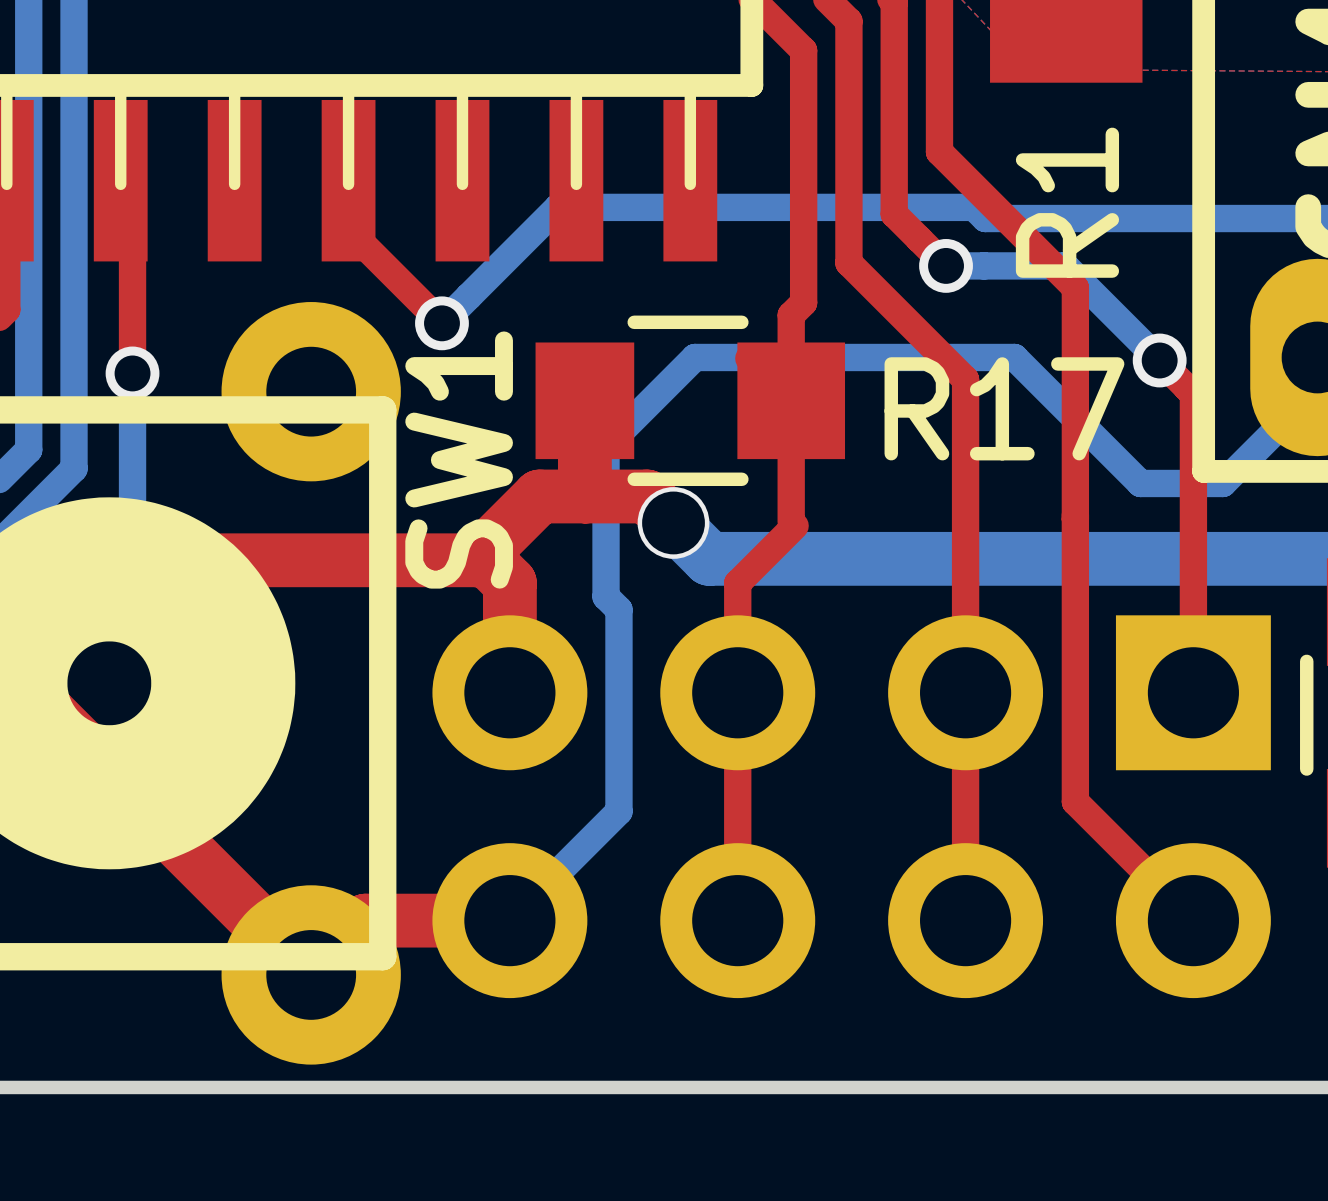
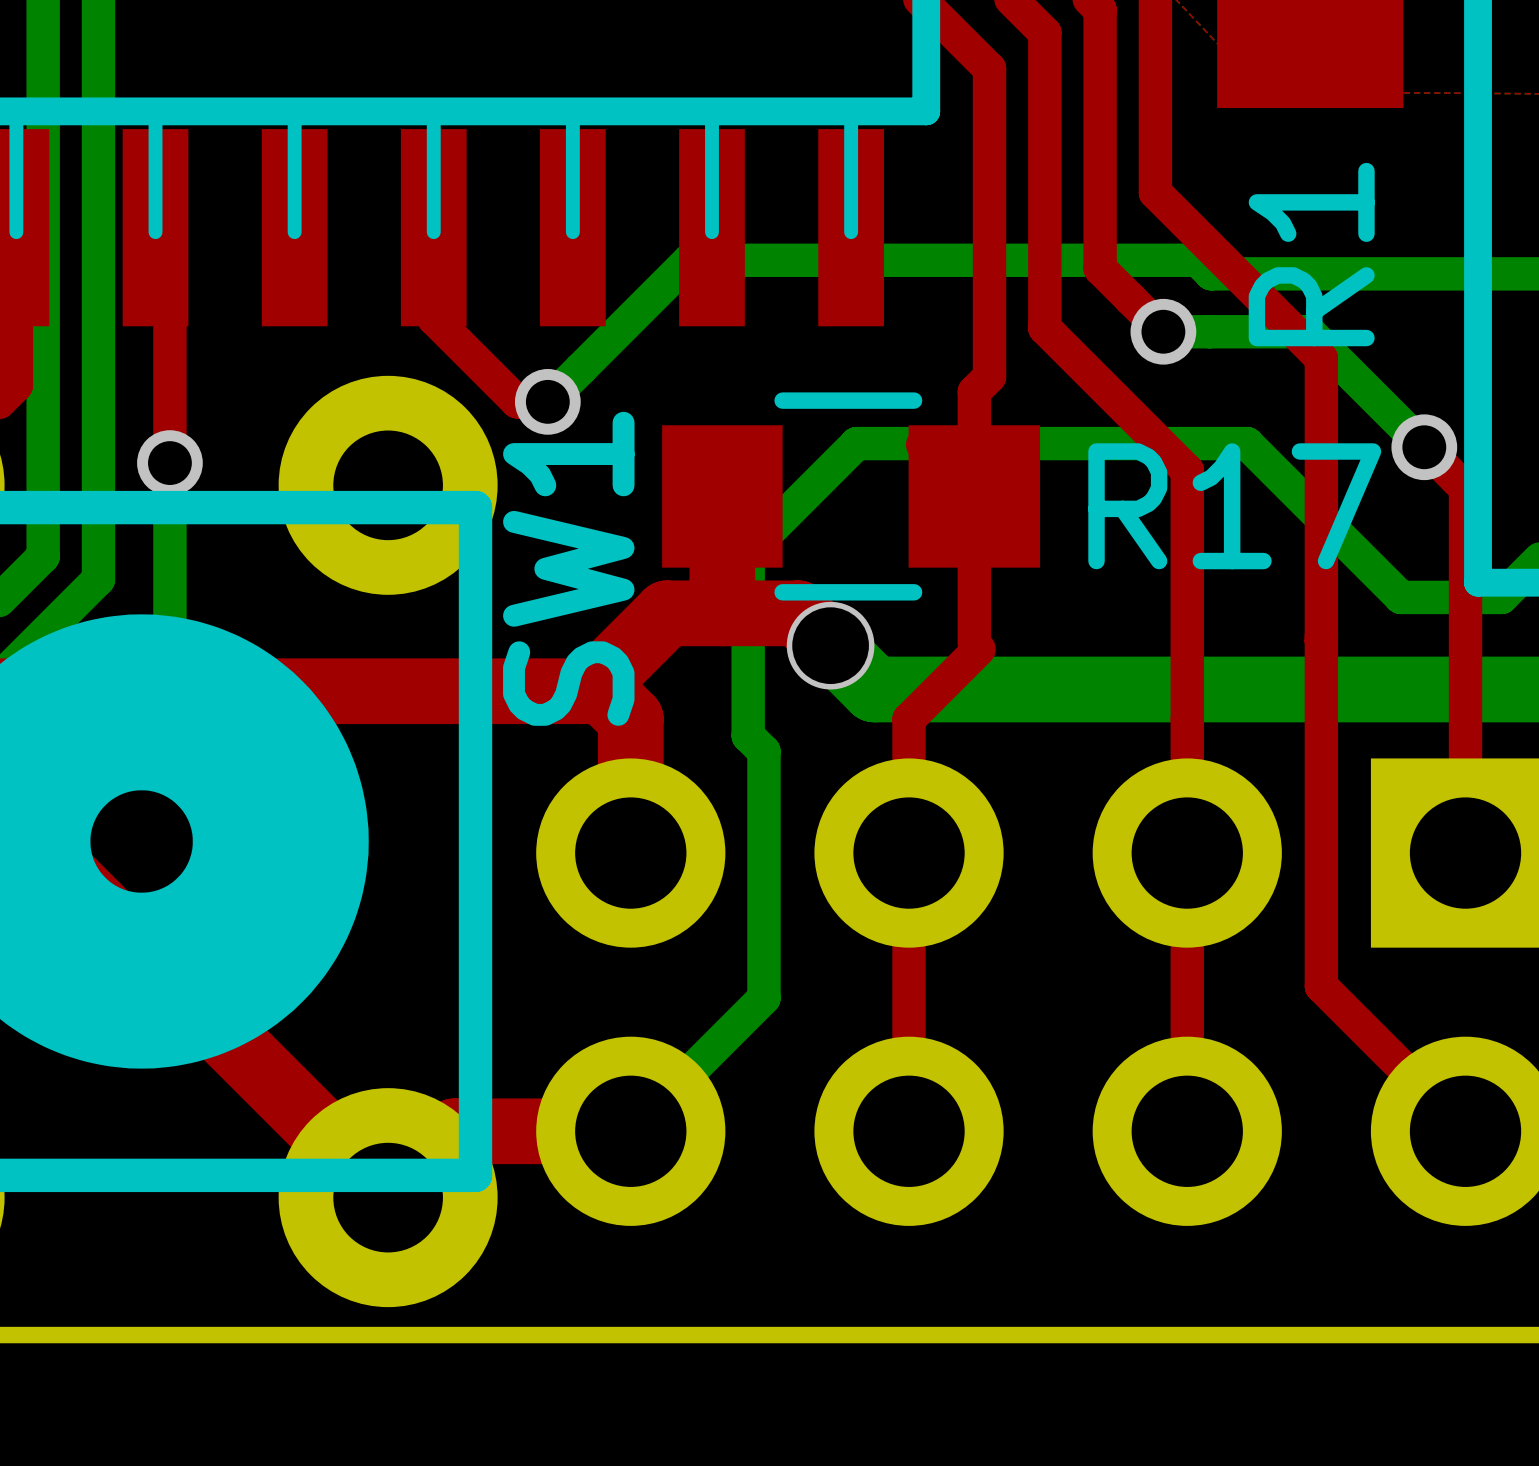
top track: (348, 229) (441, 323) -> (433, 287) (433, 318) (517, 401) (560, 401)

